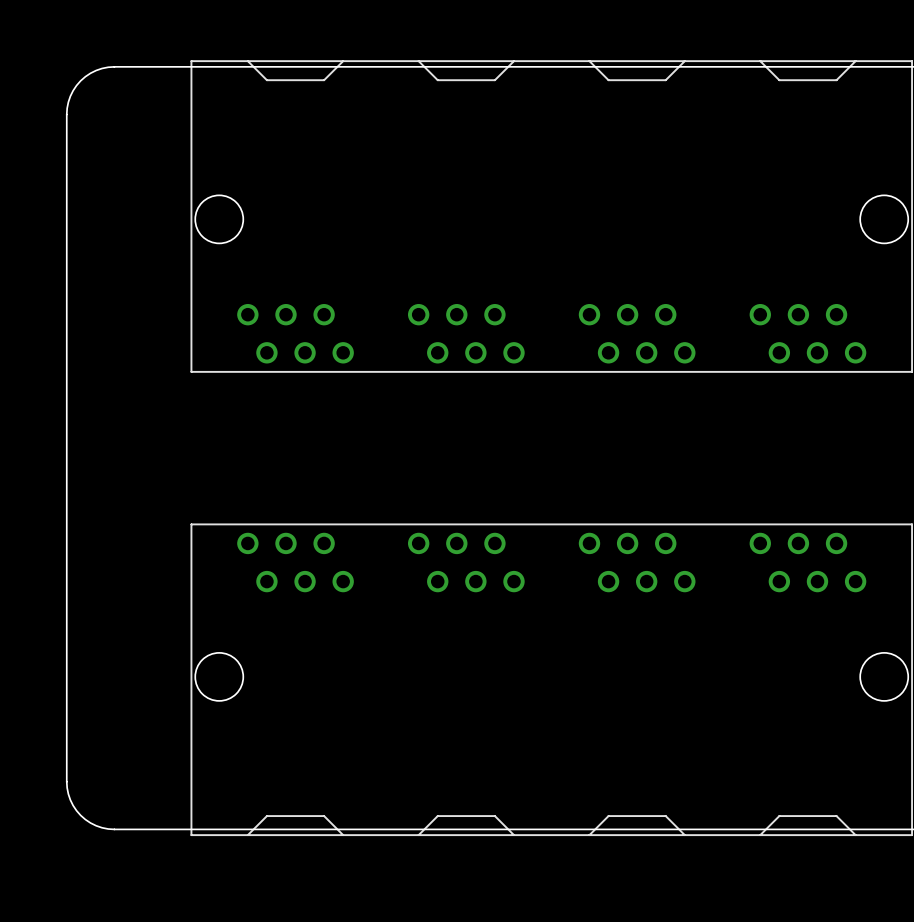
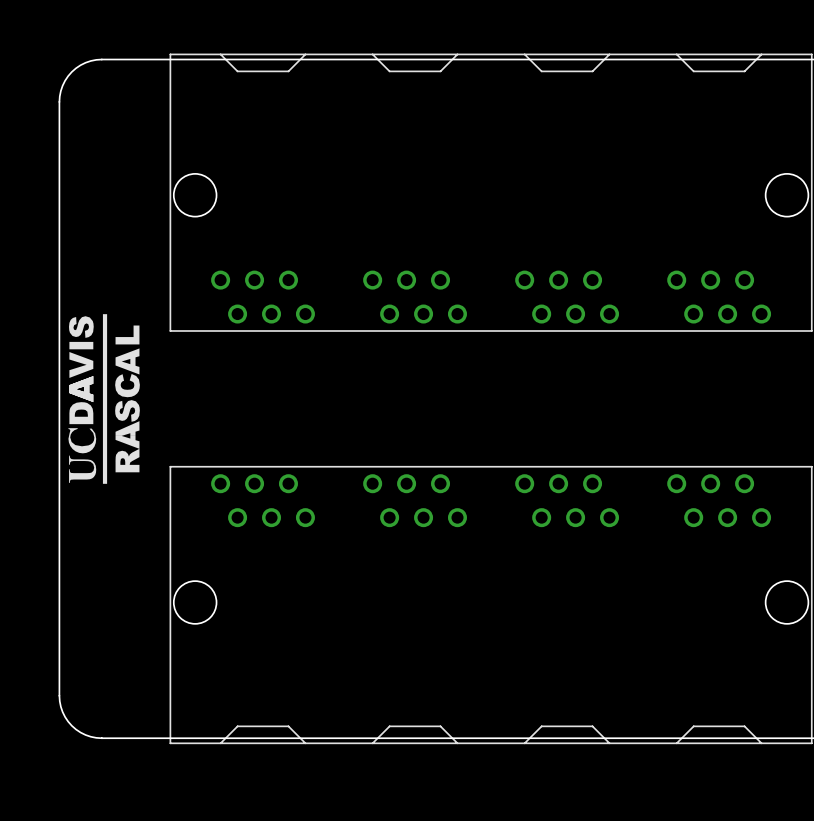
drawing: none -> [68, 314, 140, 484]

